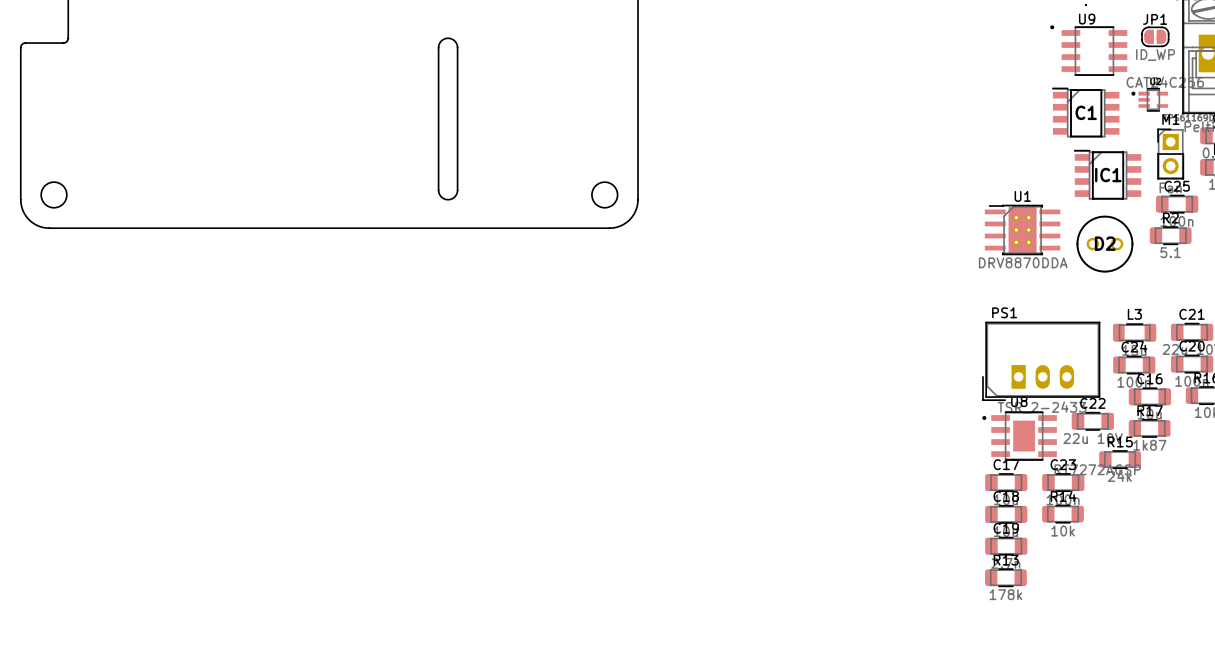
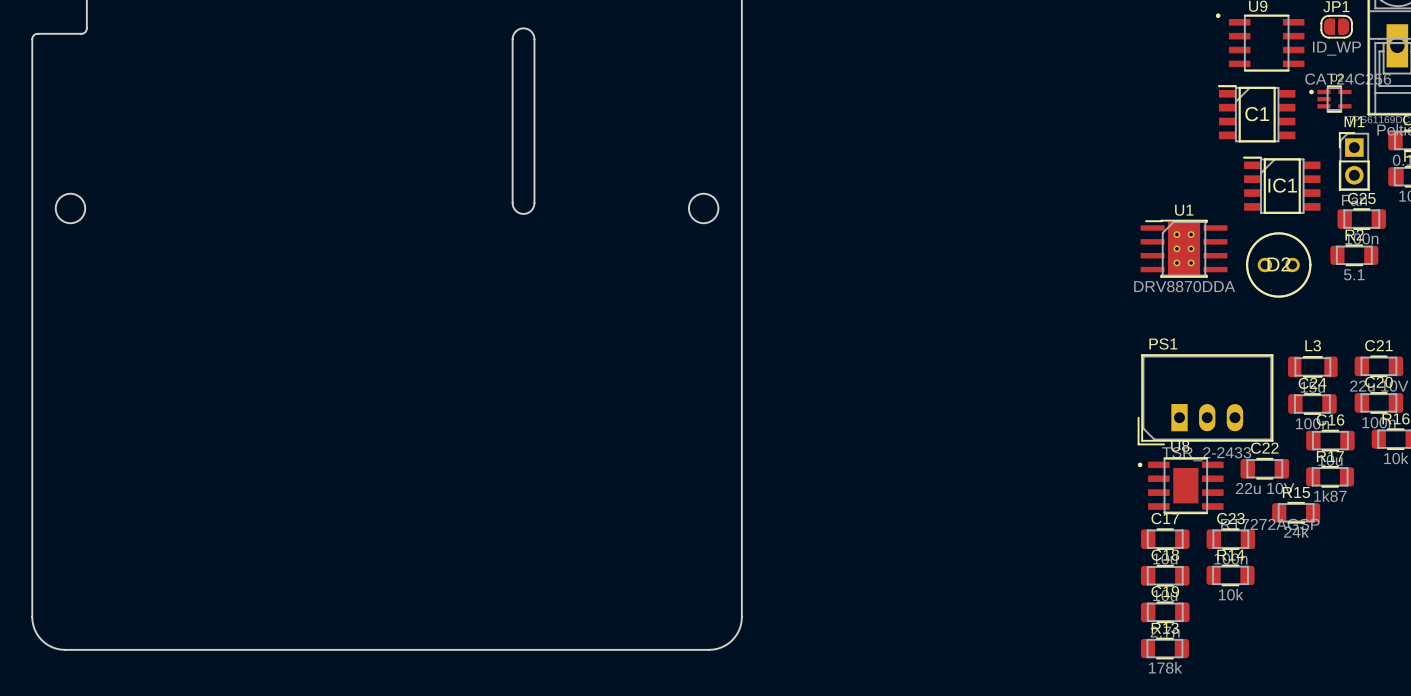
board edge: (20, 199) (22, 210) (29, 219) (38, 226) (49, 228) (609, 228) (620, 226) (629, 219) (635, 210) (637, 199) -> (32, 213) (32, 621) (36, 633) (45, 643) (56, 648) (65, 649) (709, 649) (725, 645) (737, 633) (741, 617) (741, 213)

